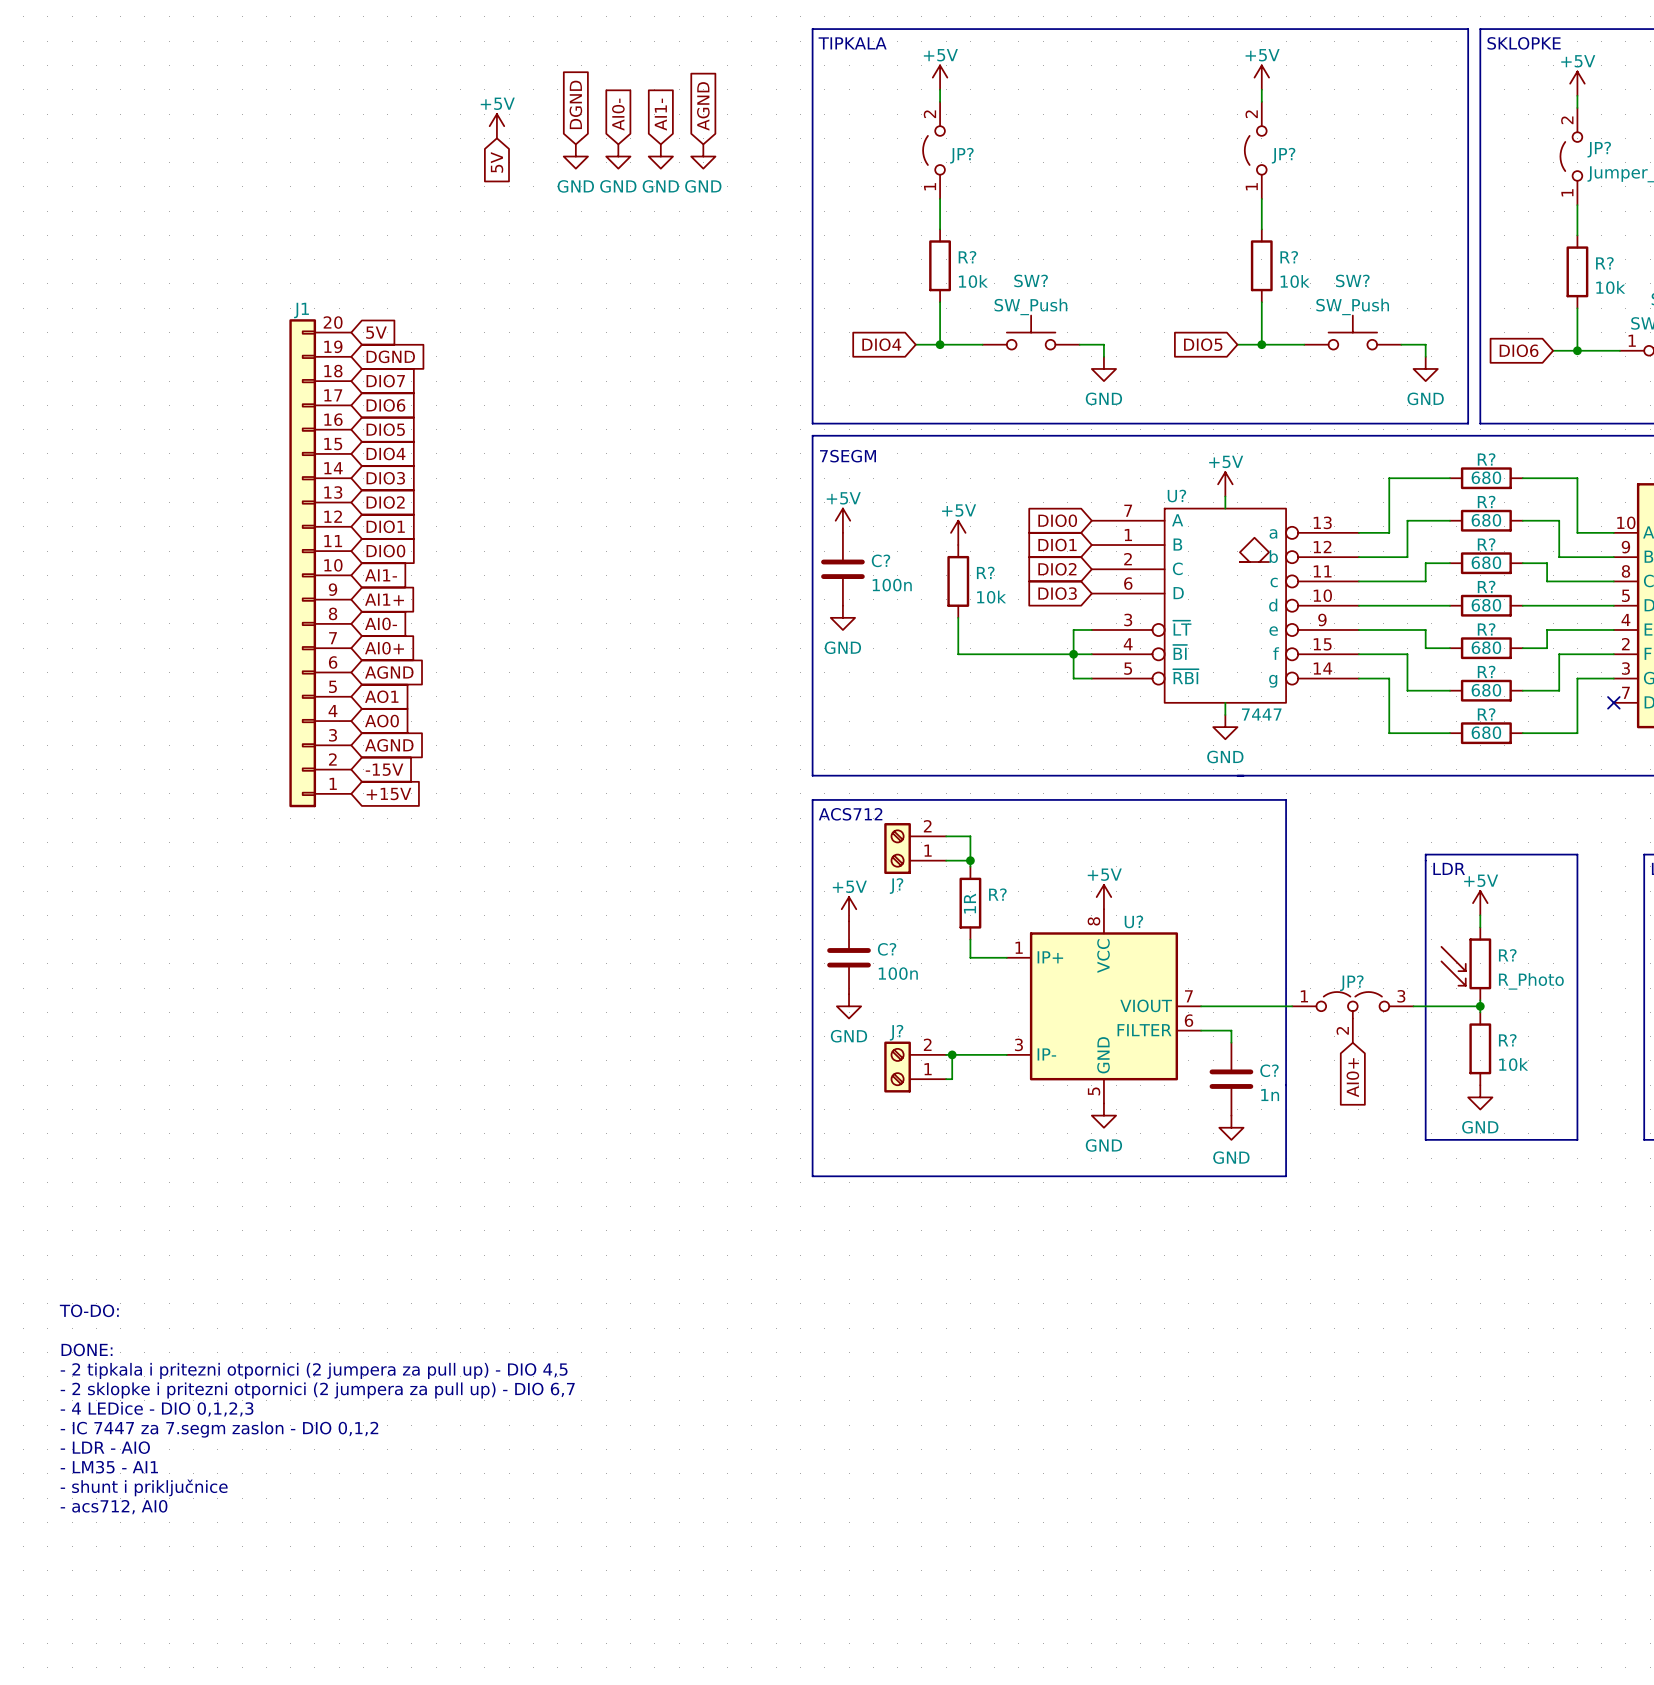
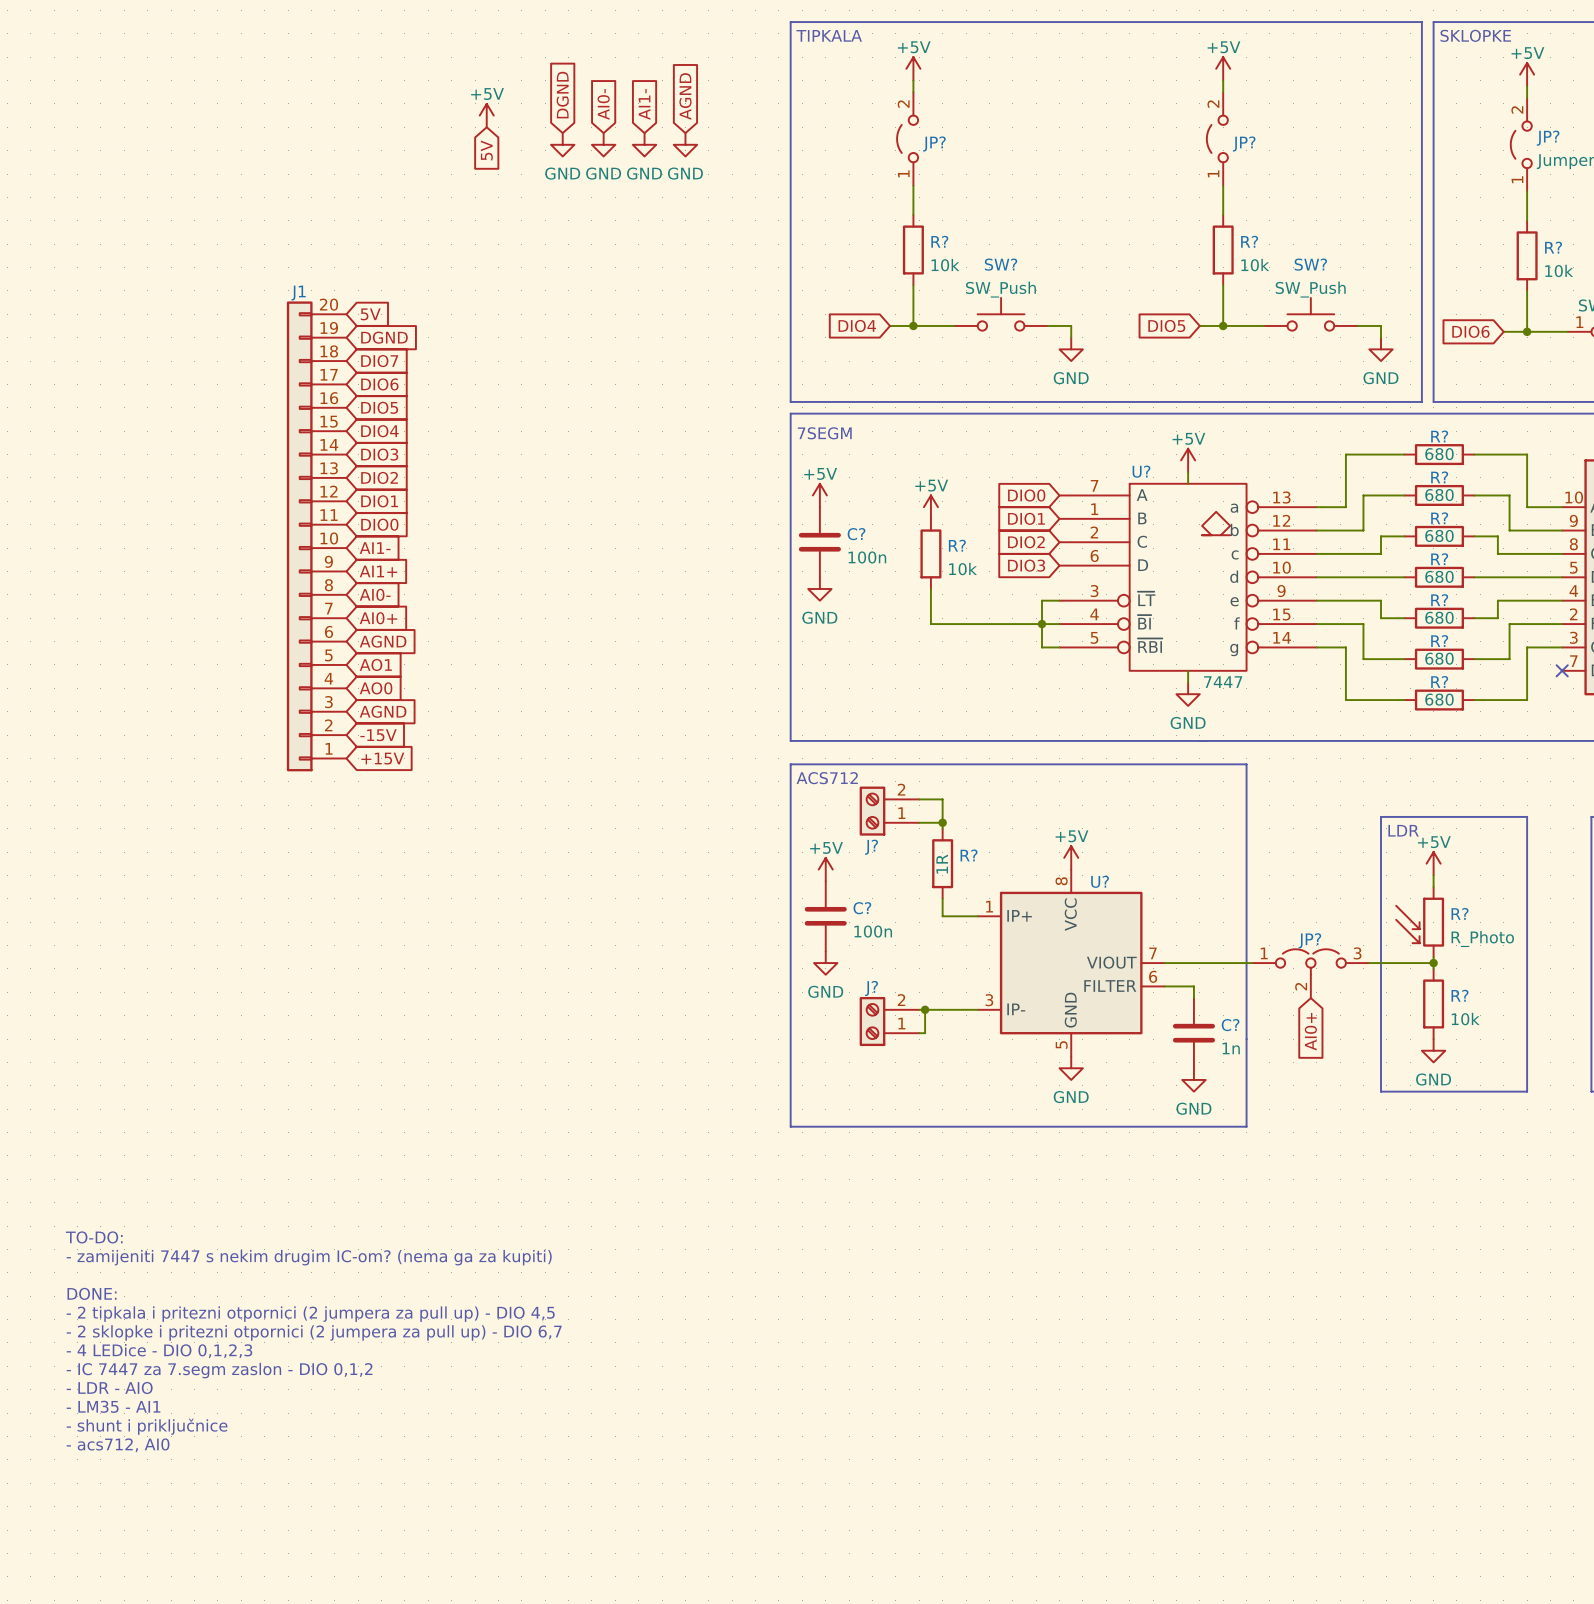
text: none -> TO-DO: (94, 1237)
text: TO-DO: (89, 1310) -> - zamijeniti 7447 s nekim drugim IC-om? (nema ga za kupiti) (309, 1257)

